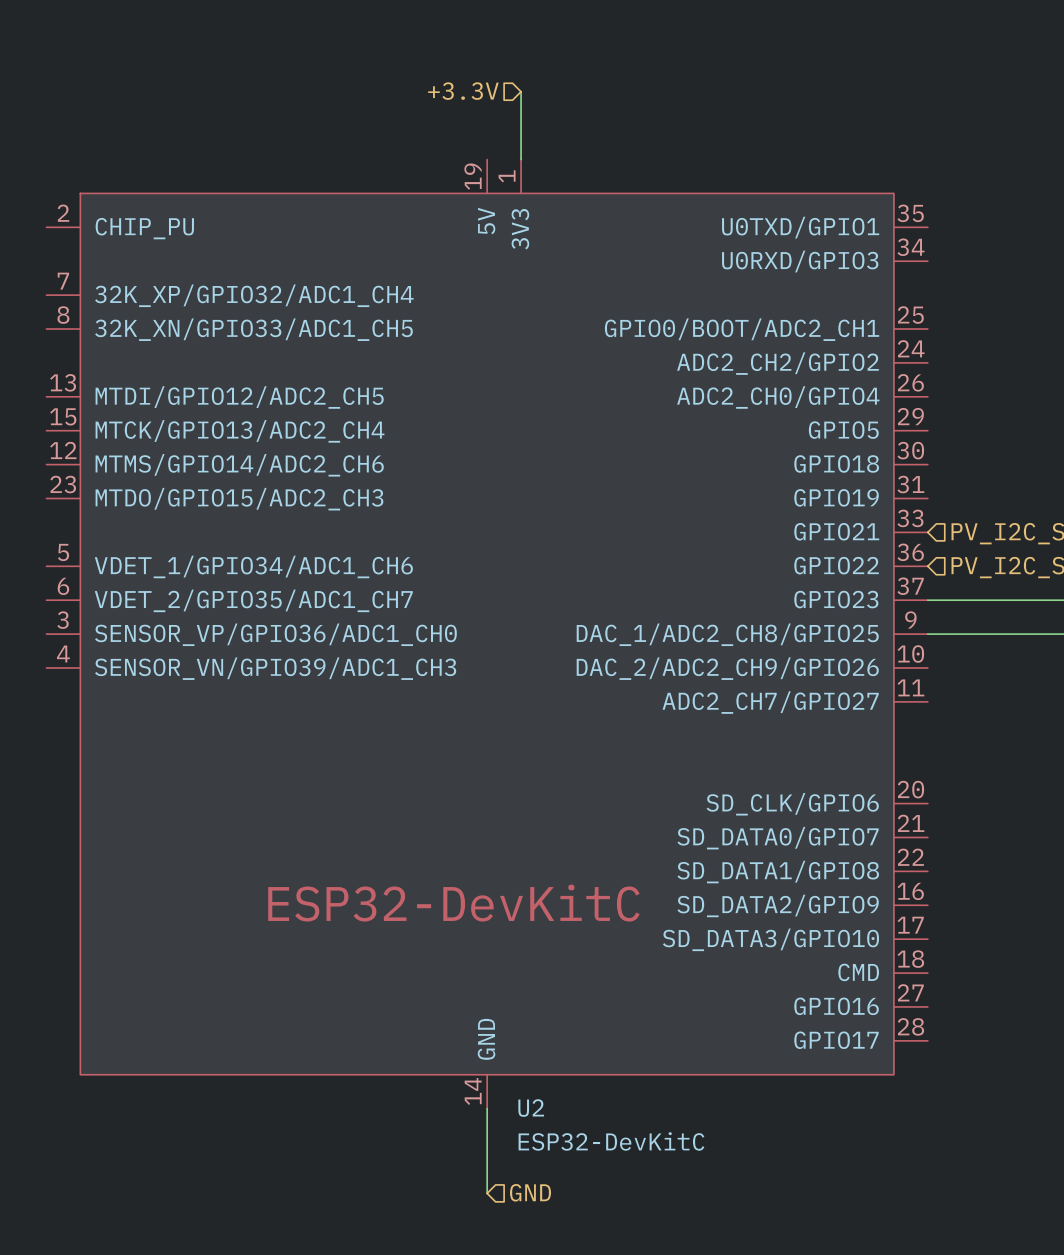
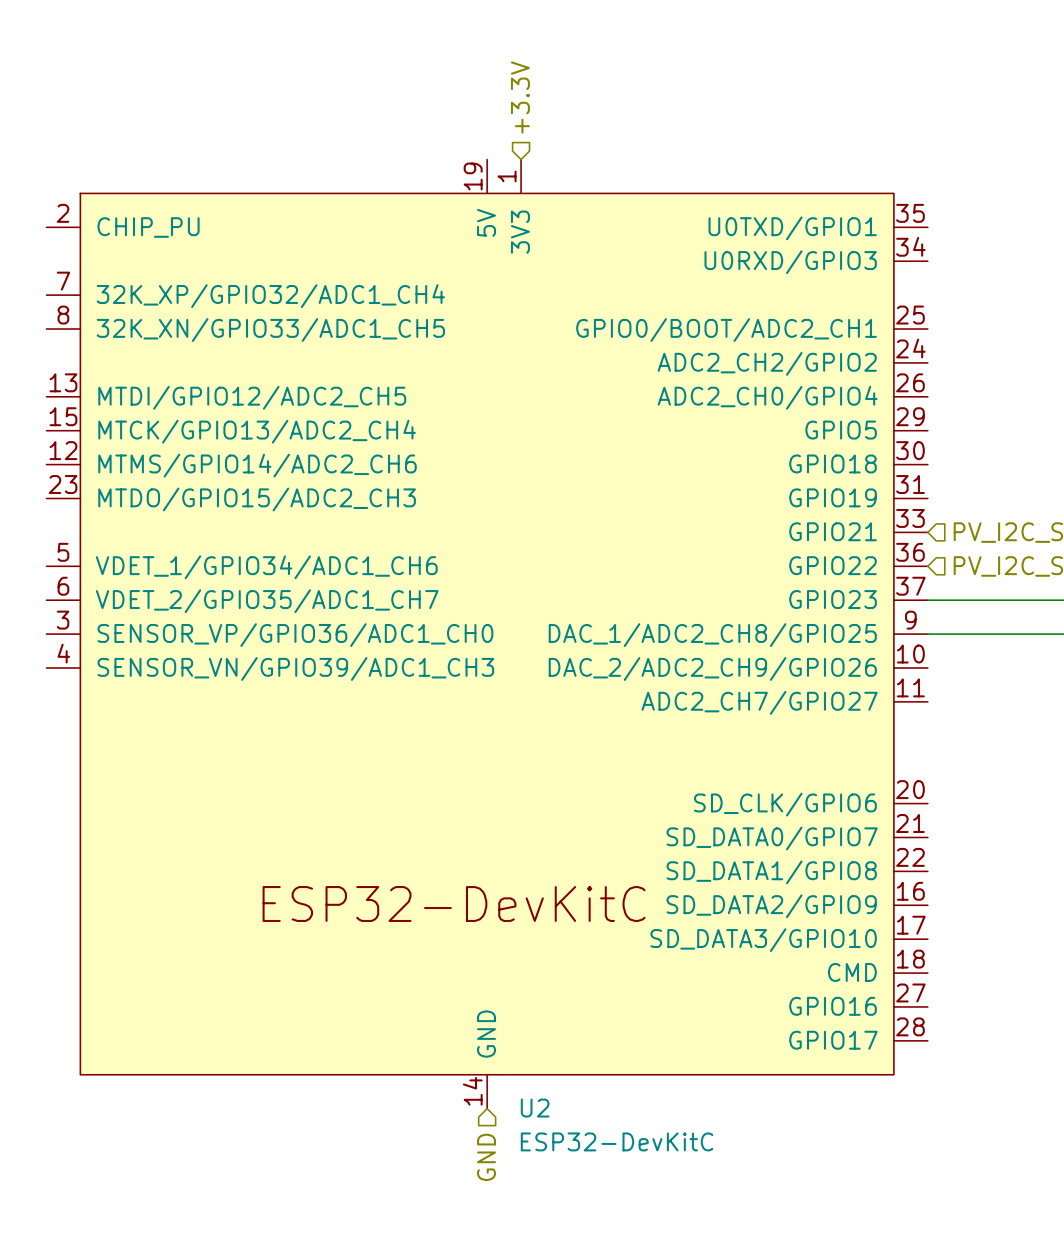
hierarchical label rotation: 0° (463, 91) -> 90° clockwise (520, 97)
wire: (521, 91) (521, 159) -> none
wire: (487, 1108) (487, 1193) -> none
hierarchical label rotation: 0° (530, 1192) -> 90° clockwise (486, 1157)

